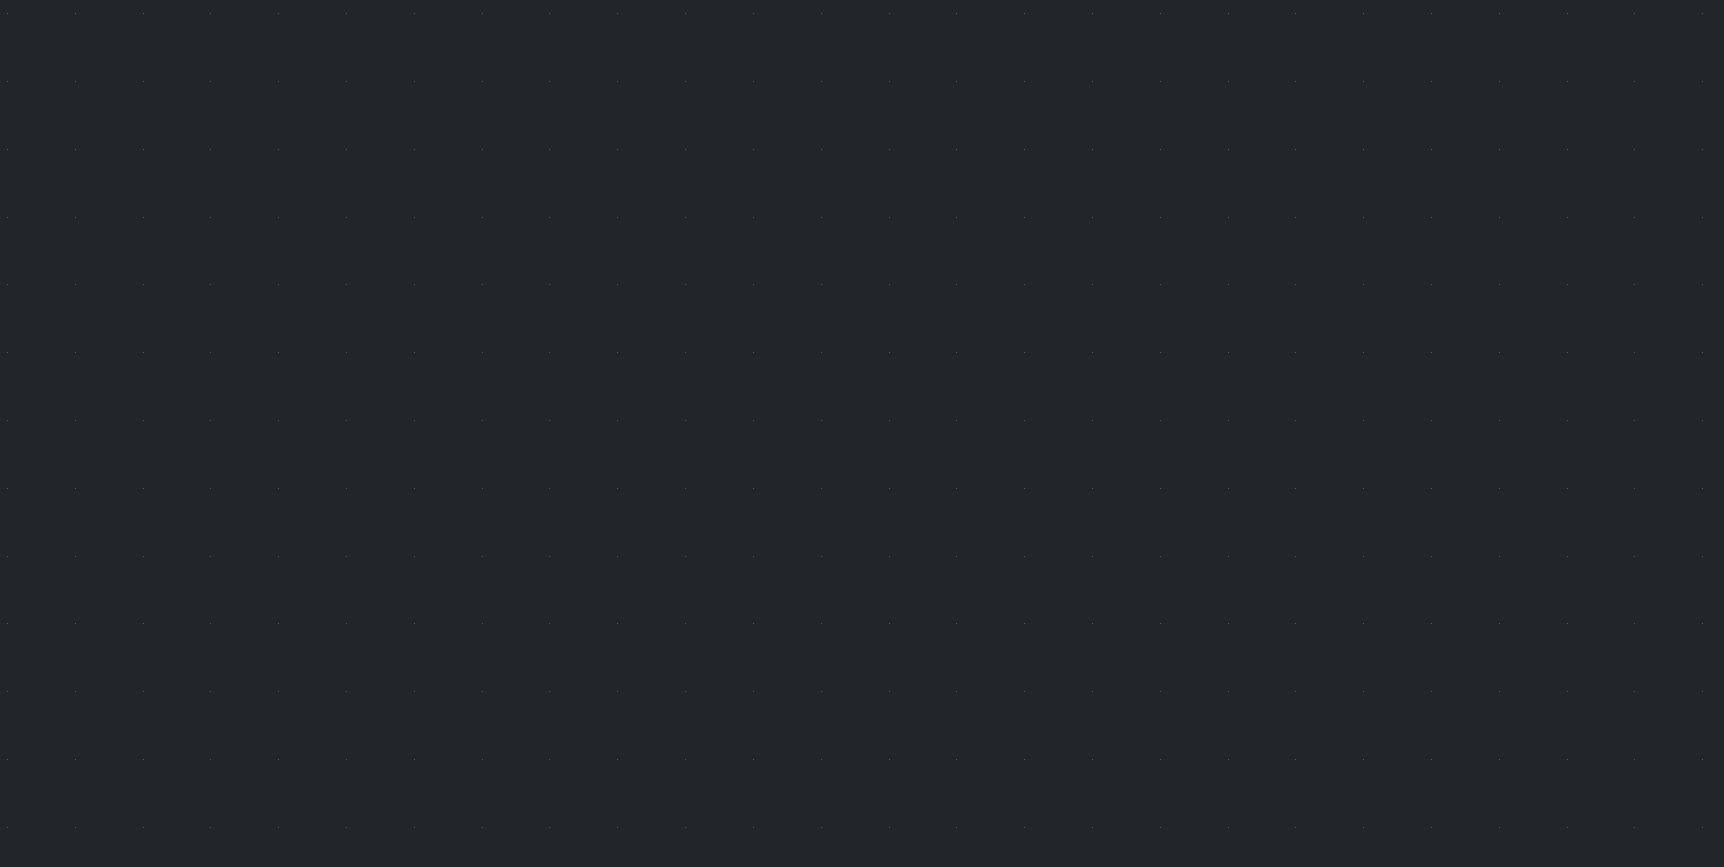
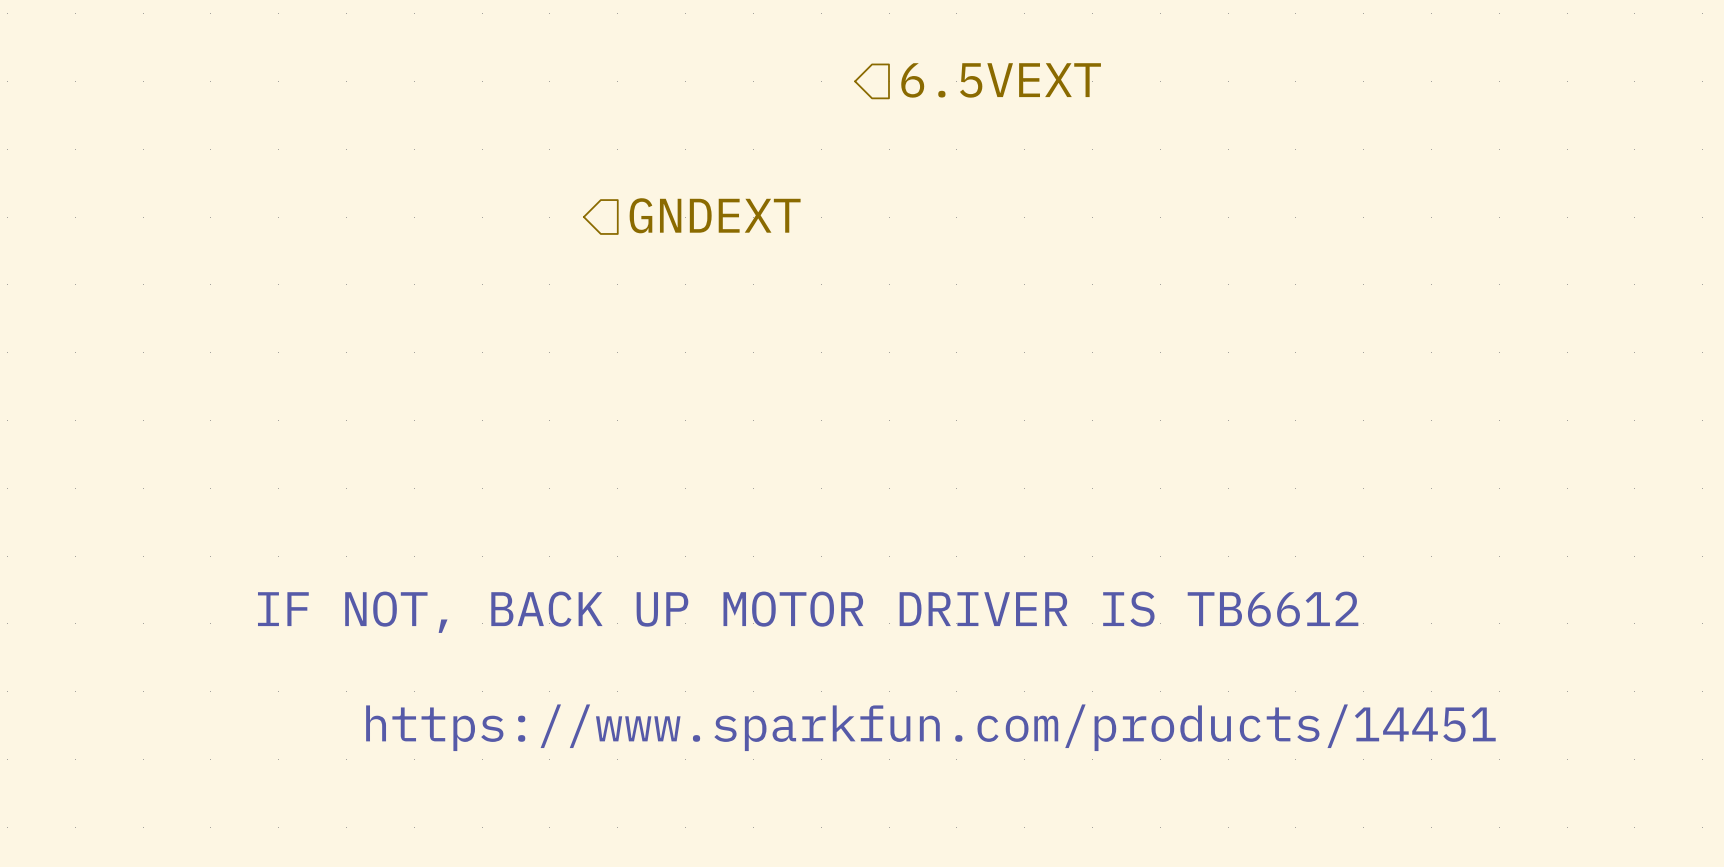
hierarchical label: none -> 6.5VEXT (1001, 80)
hierarchical label: none -> GNDEXT (715, 215)
text: none -> IF NOT, BACK UP MOTOR DRIVER IS TB6612 (808, 612)
text: none -> https://www.sparkfun.com/products/14451 (930, 727)

